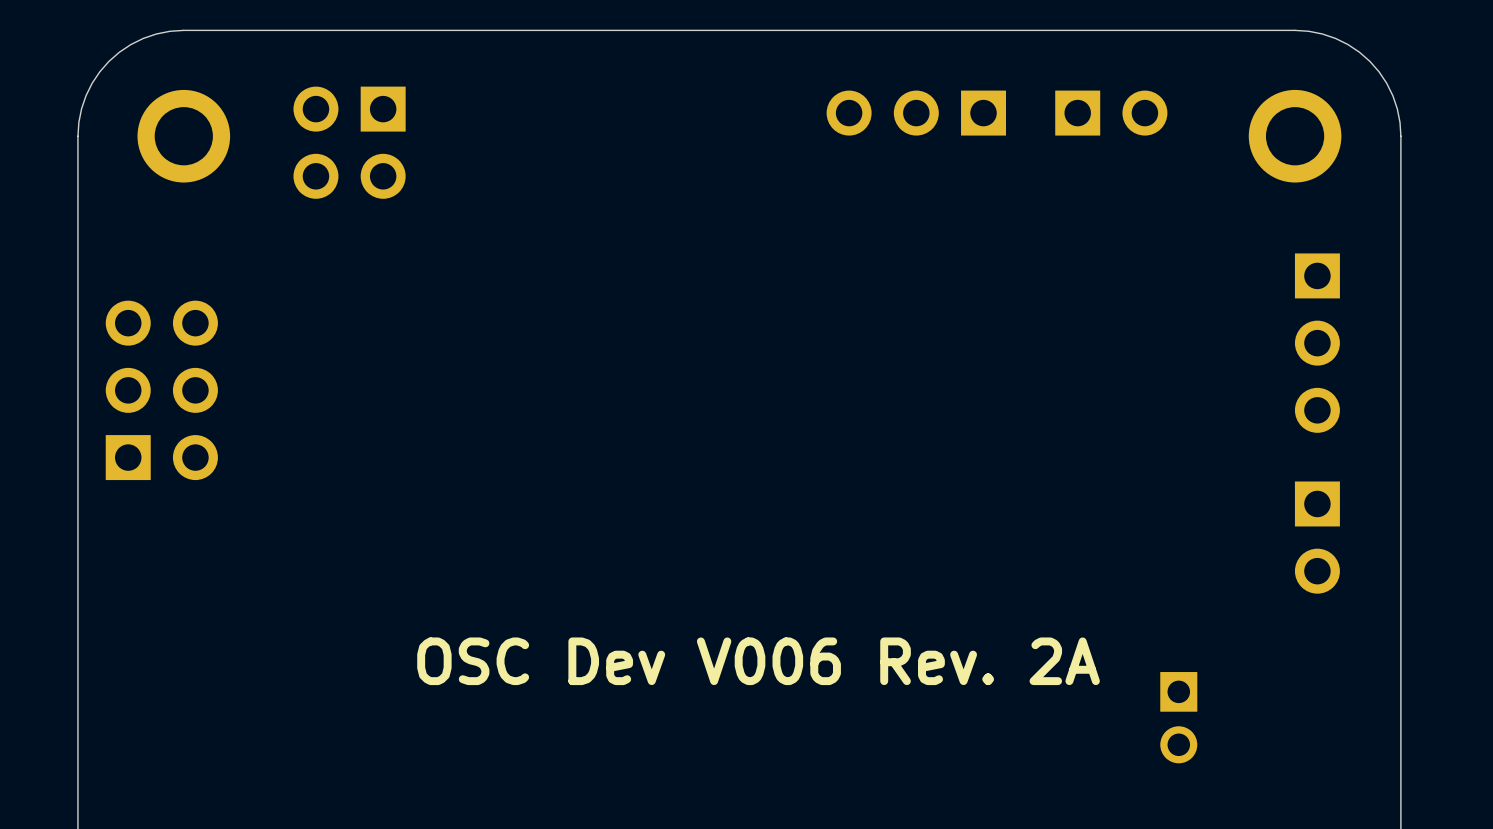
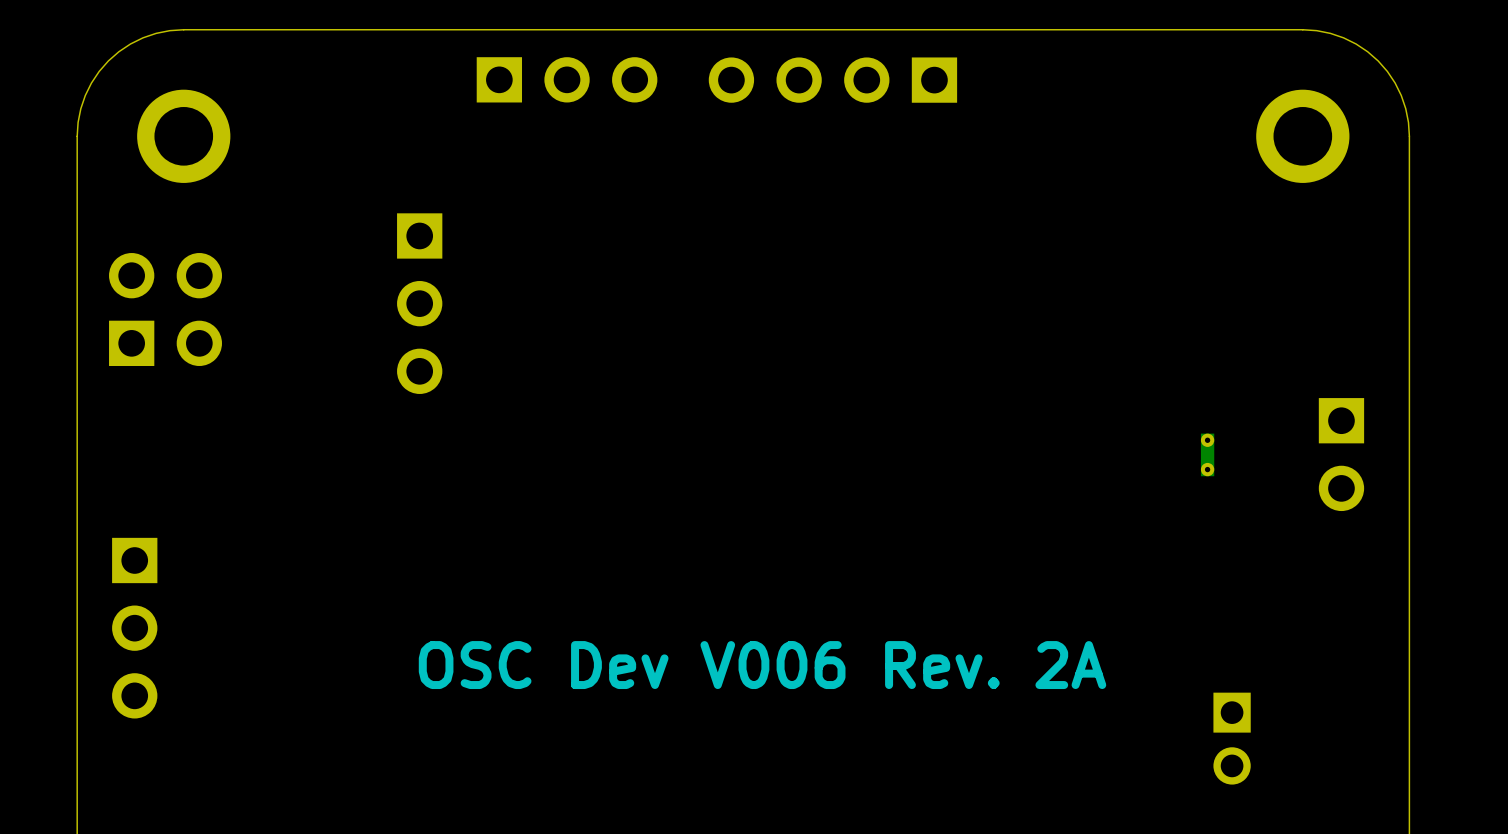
part: none -> (567, 79)
part: none -> (832, 80)
part: (916, 113) -> none
part: (1111, 113) -> none
part rotation: 0° (349, 142) -> 180° (165, 309)
part position: (349, 142) -> (165, 309)
part: none -> (419, 303)
part: (1317, 343) -> none
part: (161, 390) -> none
part: none -> (1207, 454)
part position: (1317, 537) -> (1341, 454)
part: none -> (134, 628)
part position: (1178, 717) -> (1232, 738)

